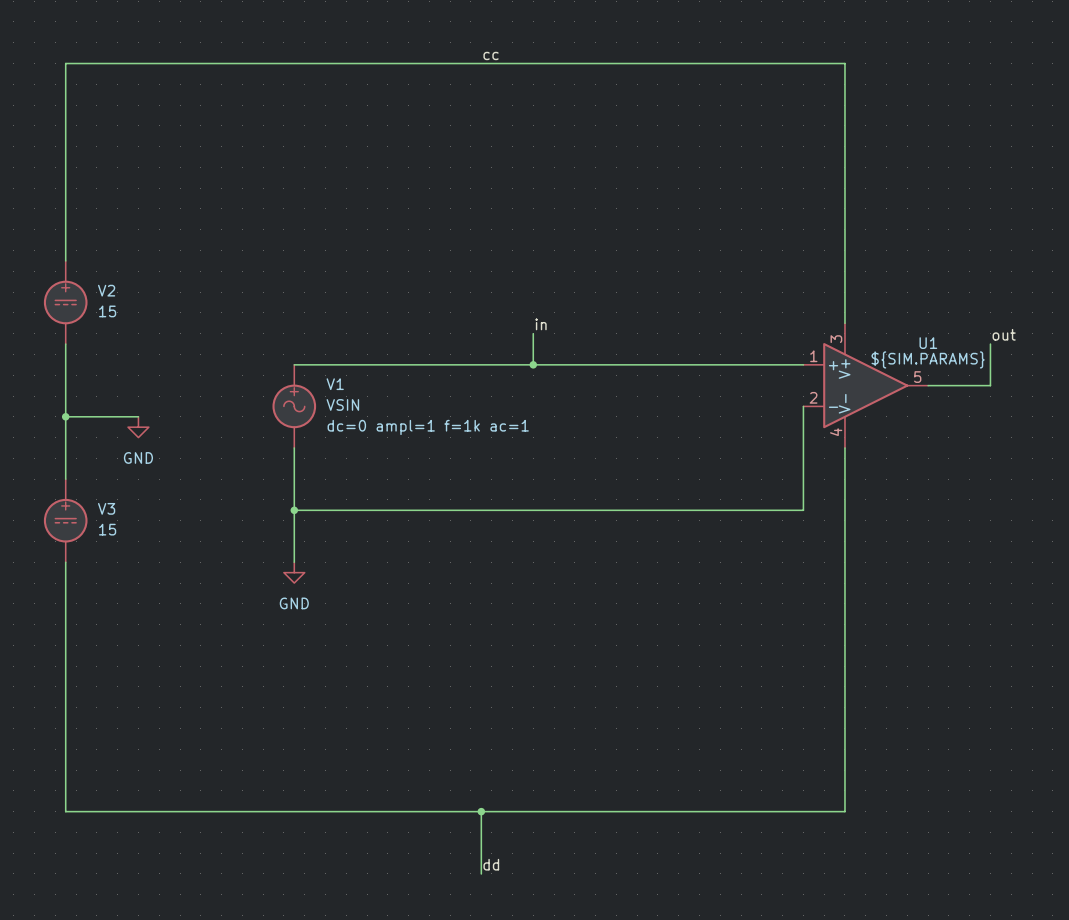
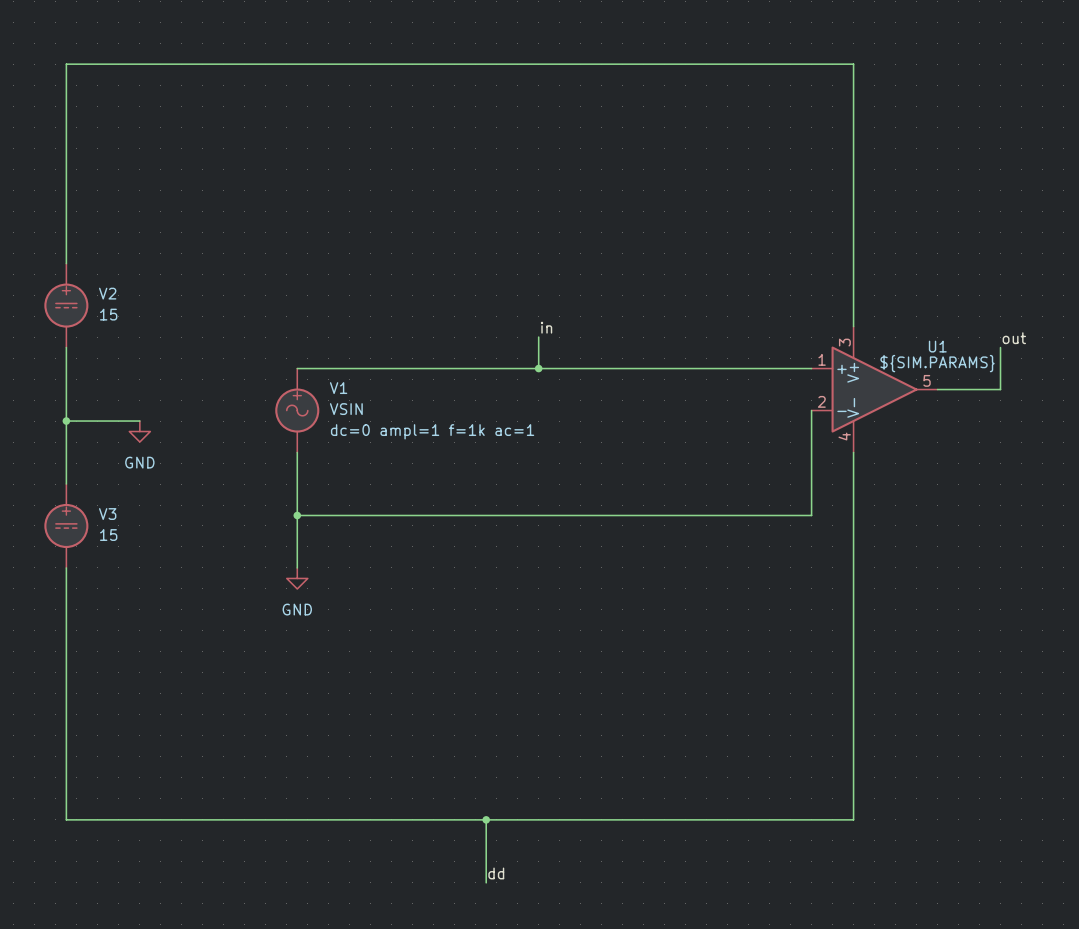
label: cc (491, 55) -> none

